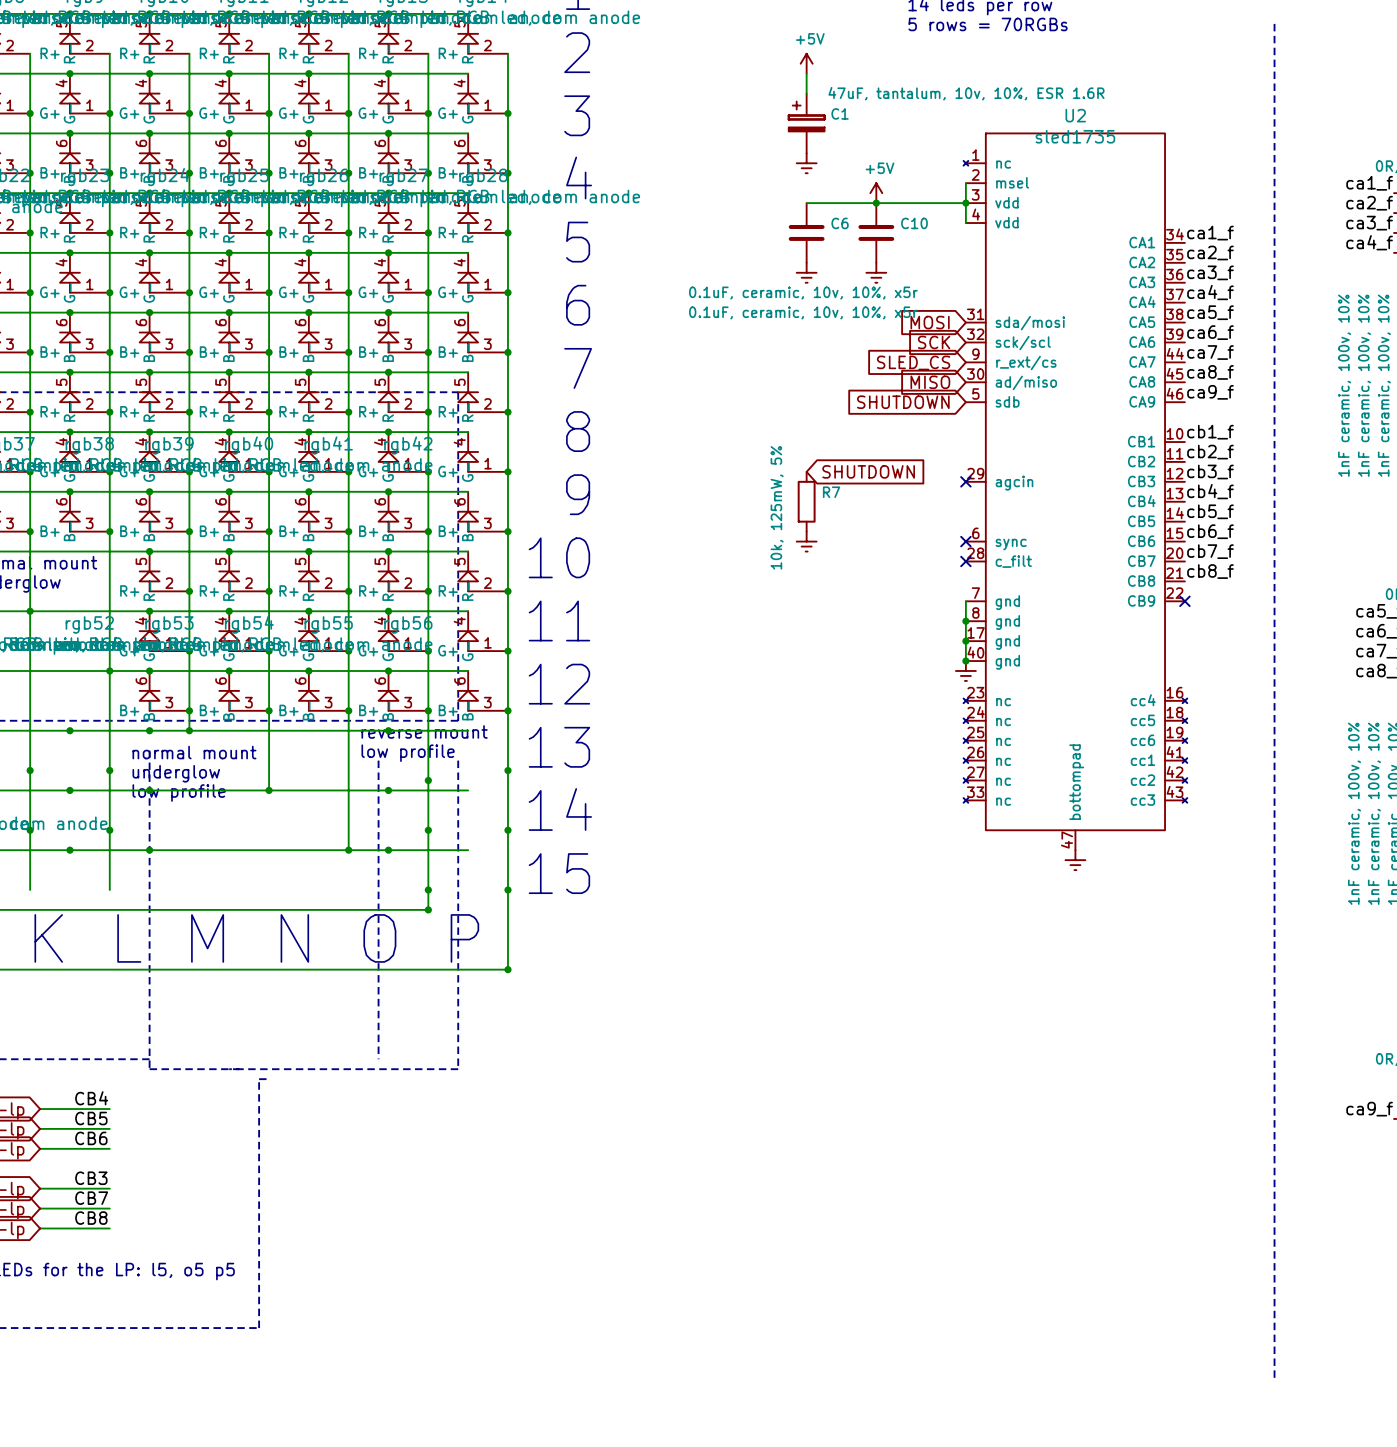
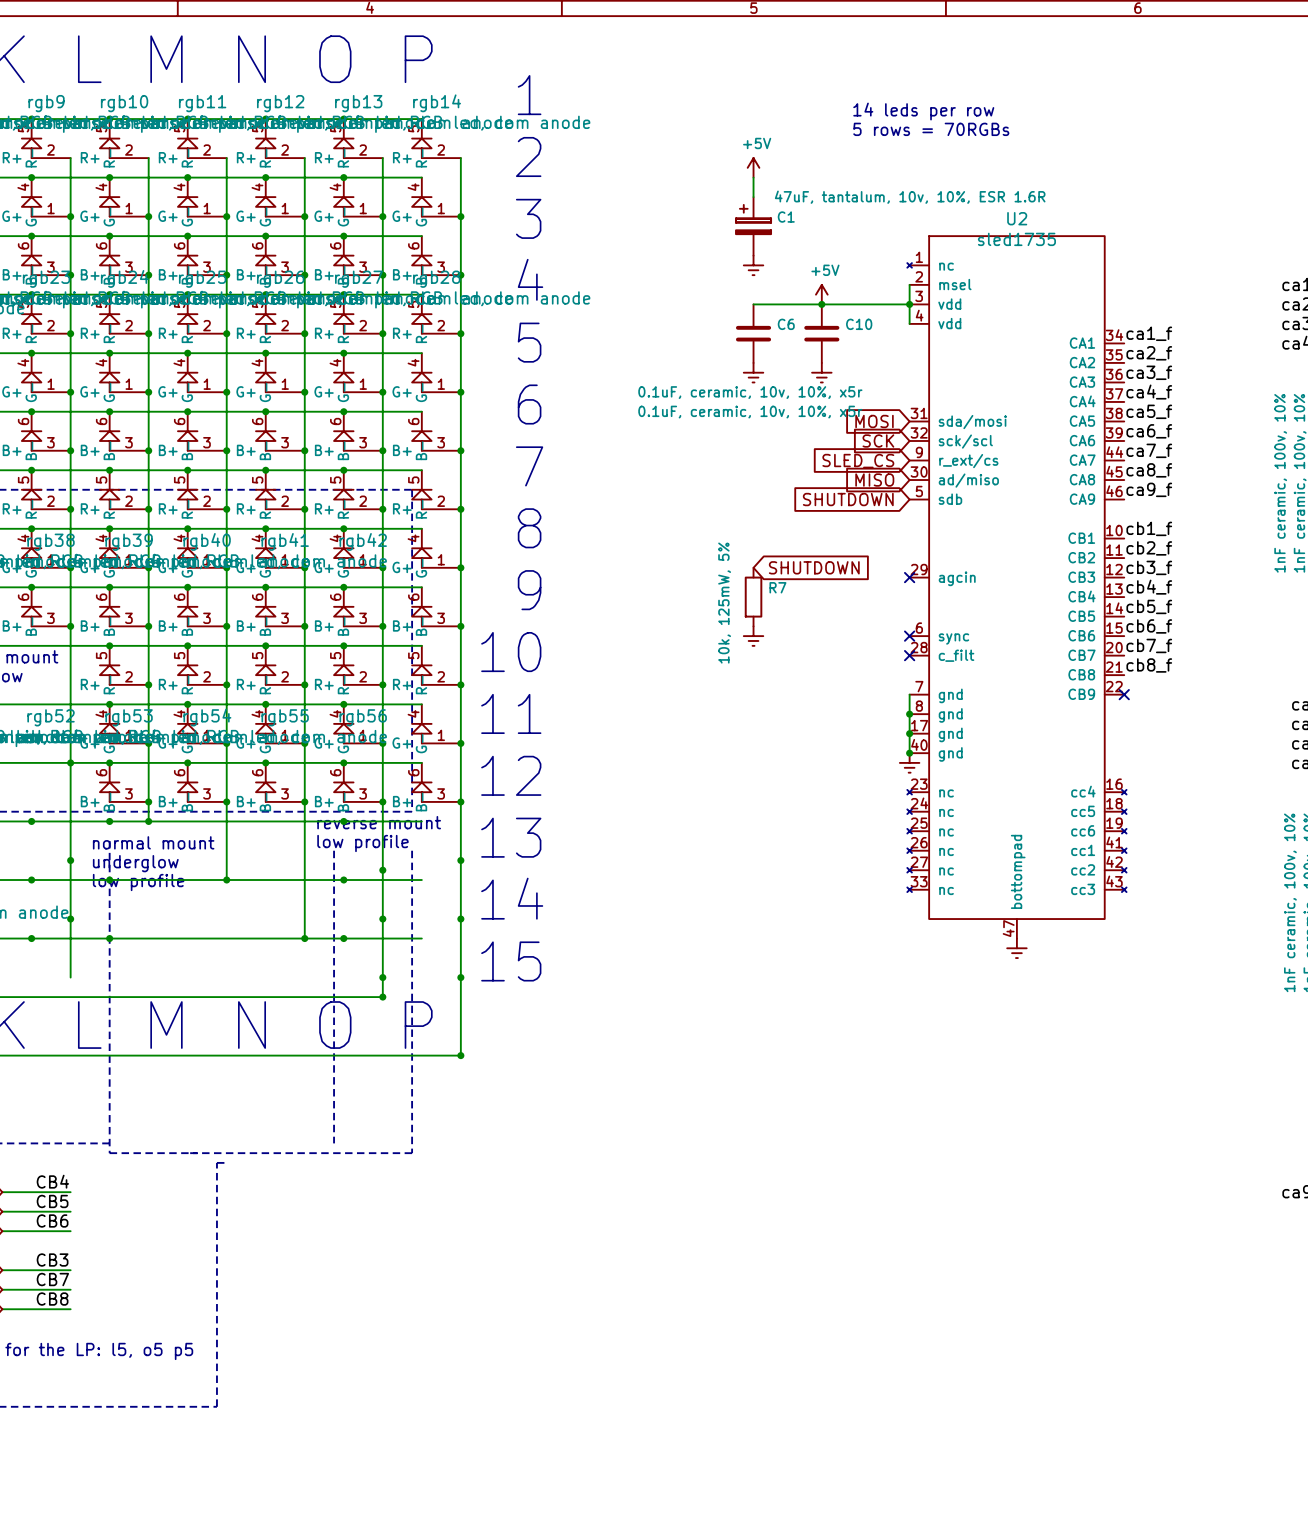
line: (1274, 23) (1274, 1377) -> none

